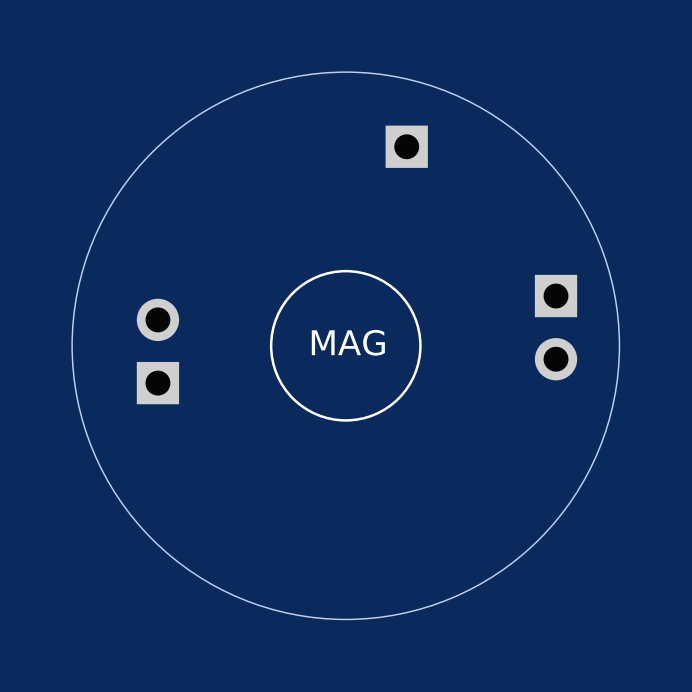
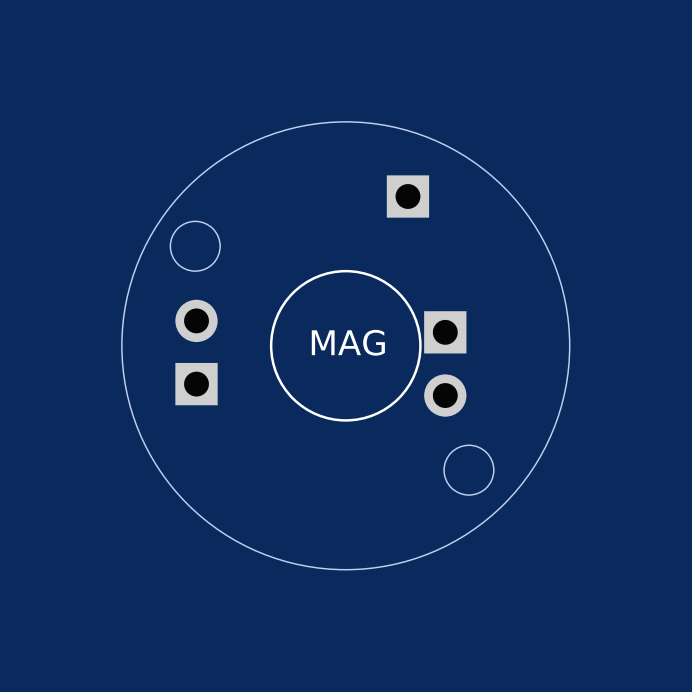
round board edge size: [71, 71, 621, 621] -> [121, 121, 571, 571]
part position: (406, 146) -> (407, 196)
round board edge: none -> [169, 220, 221, 272]
part position: (556, 327) -> (445, 363)
part position: (157, 351) -> (196, 352)
round board edge: none -> [443, 444, 495, 496]

